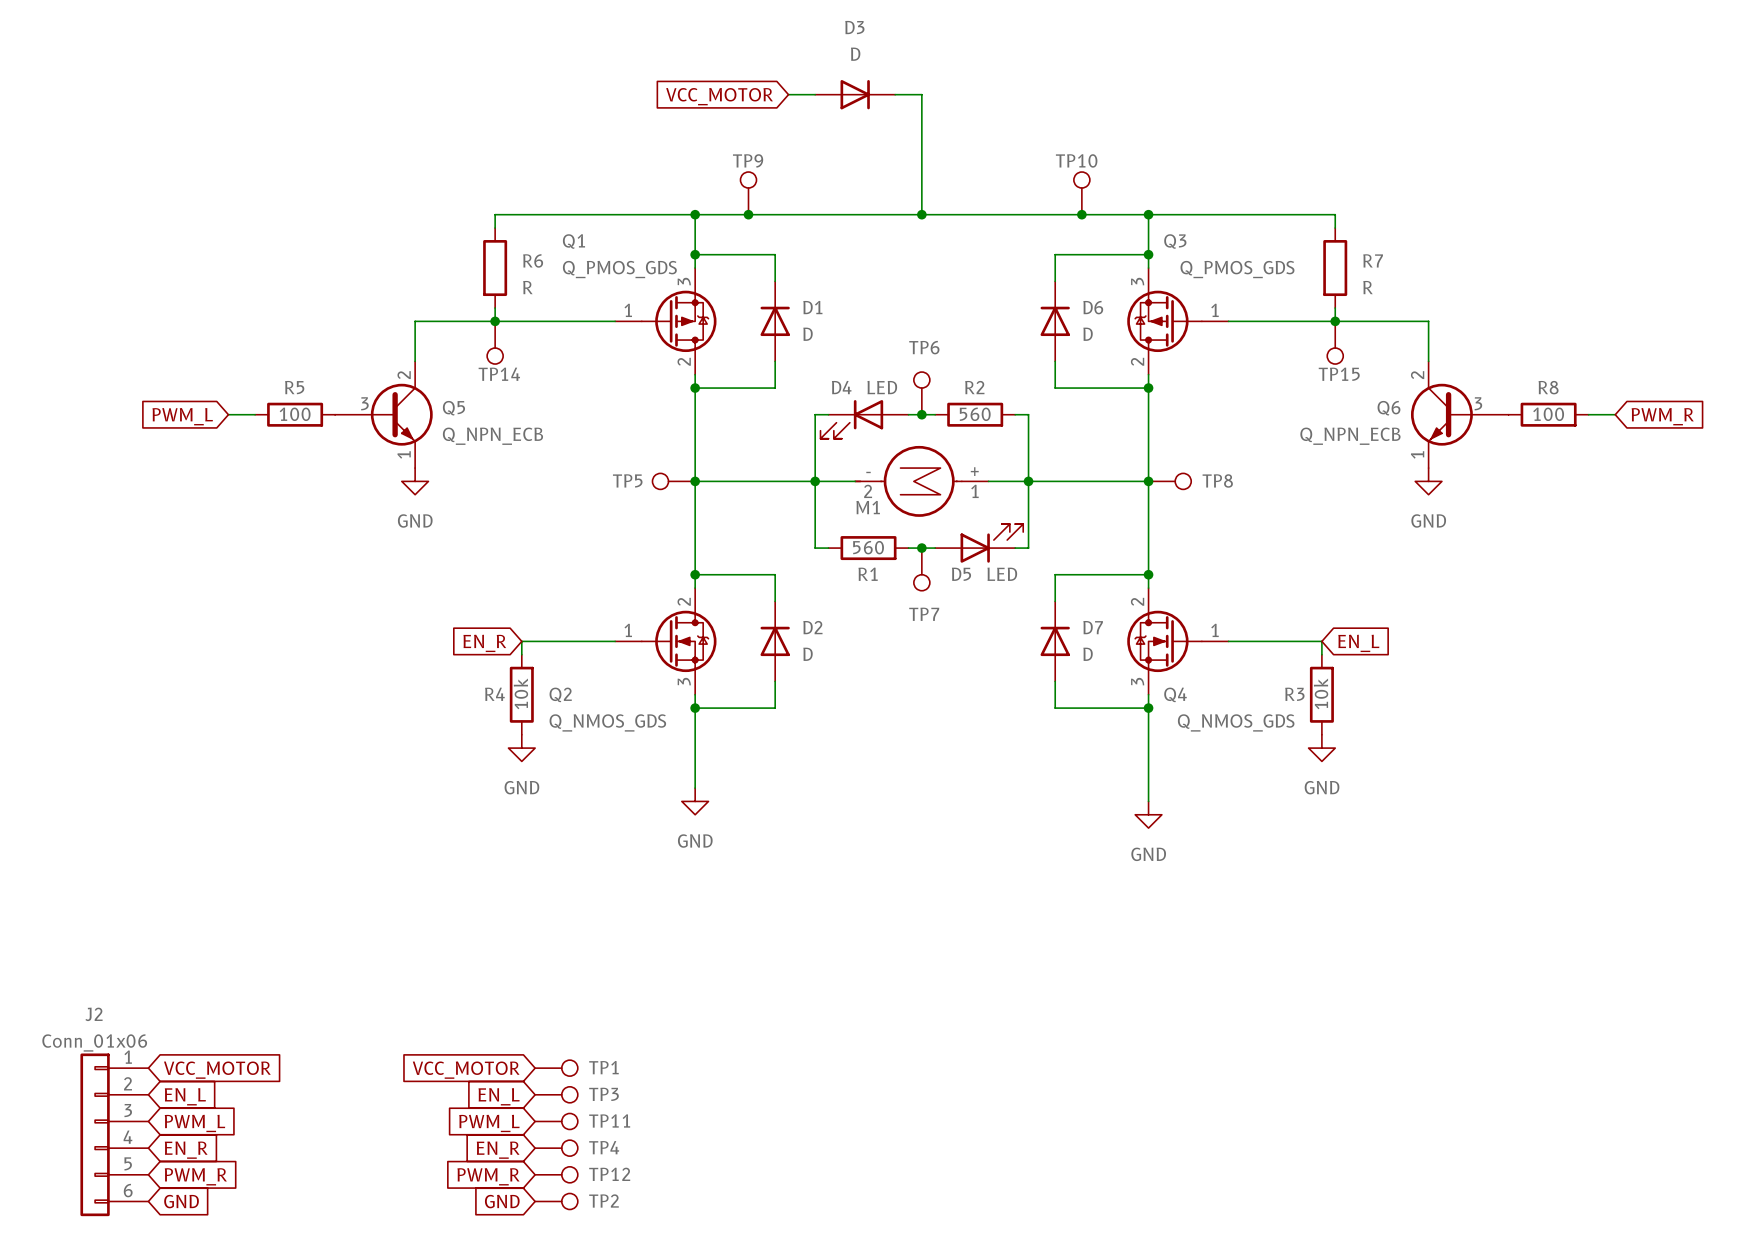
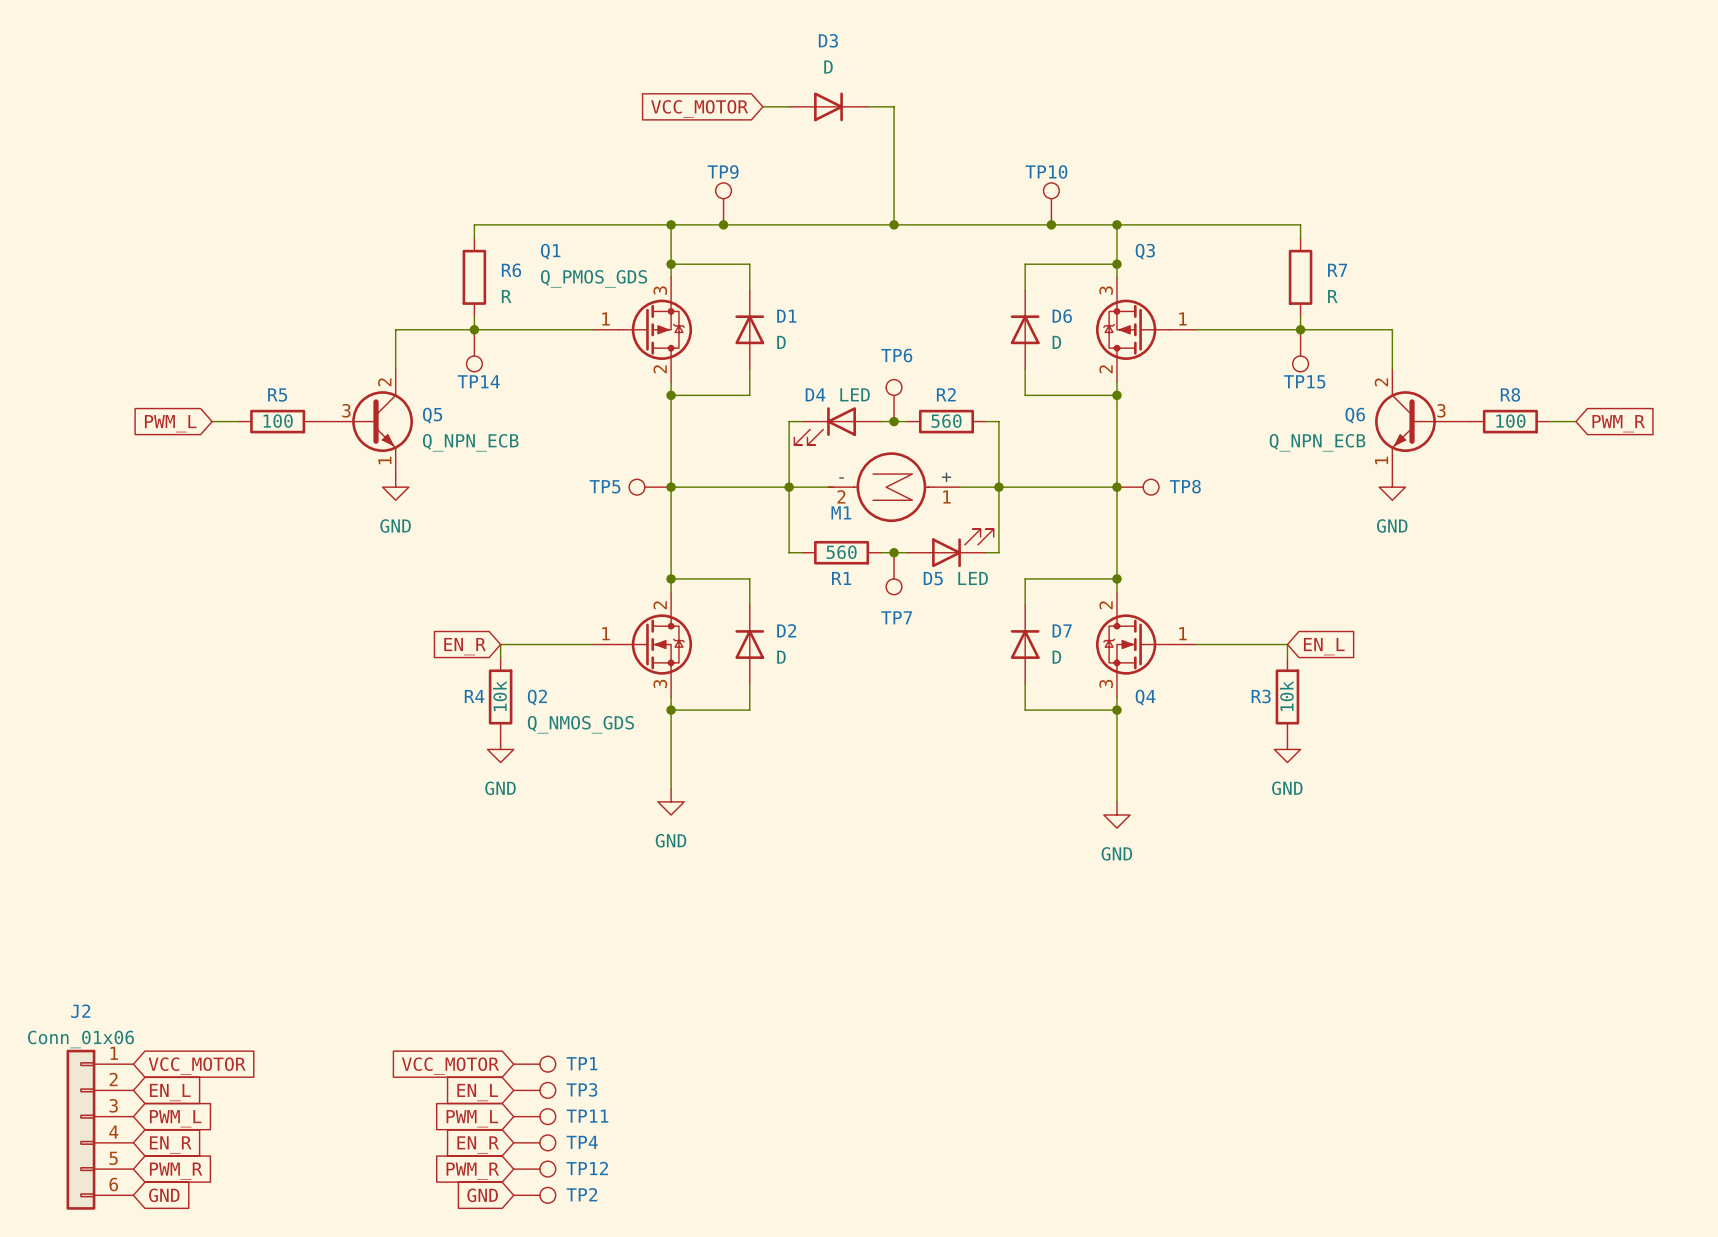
Q3 value: Q_PMOS_GDS (1237, 269) -> none
Q4 value: Q_NMOS_GDS (1236, 722) -> none

